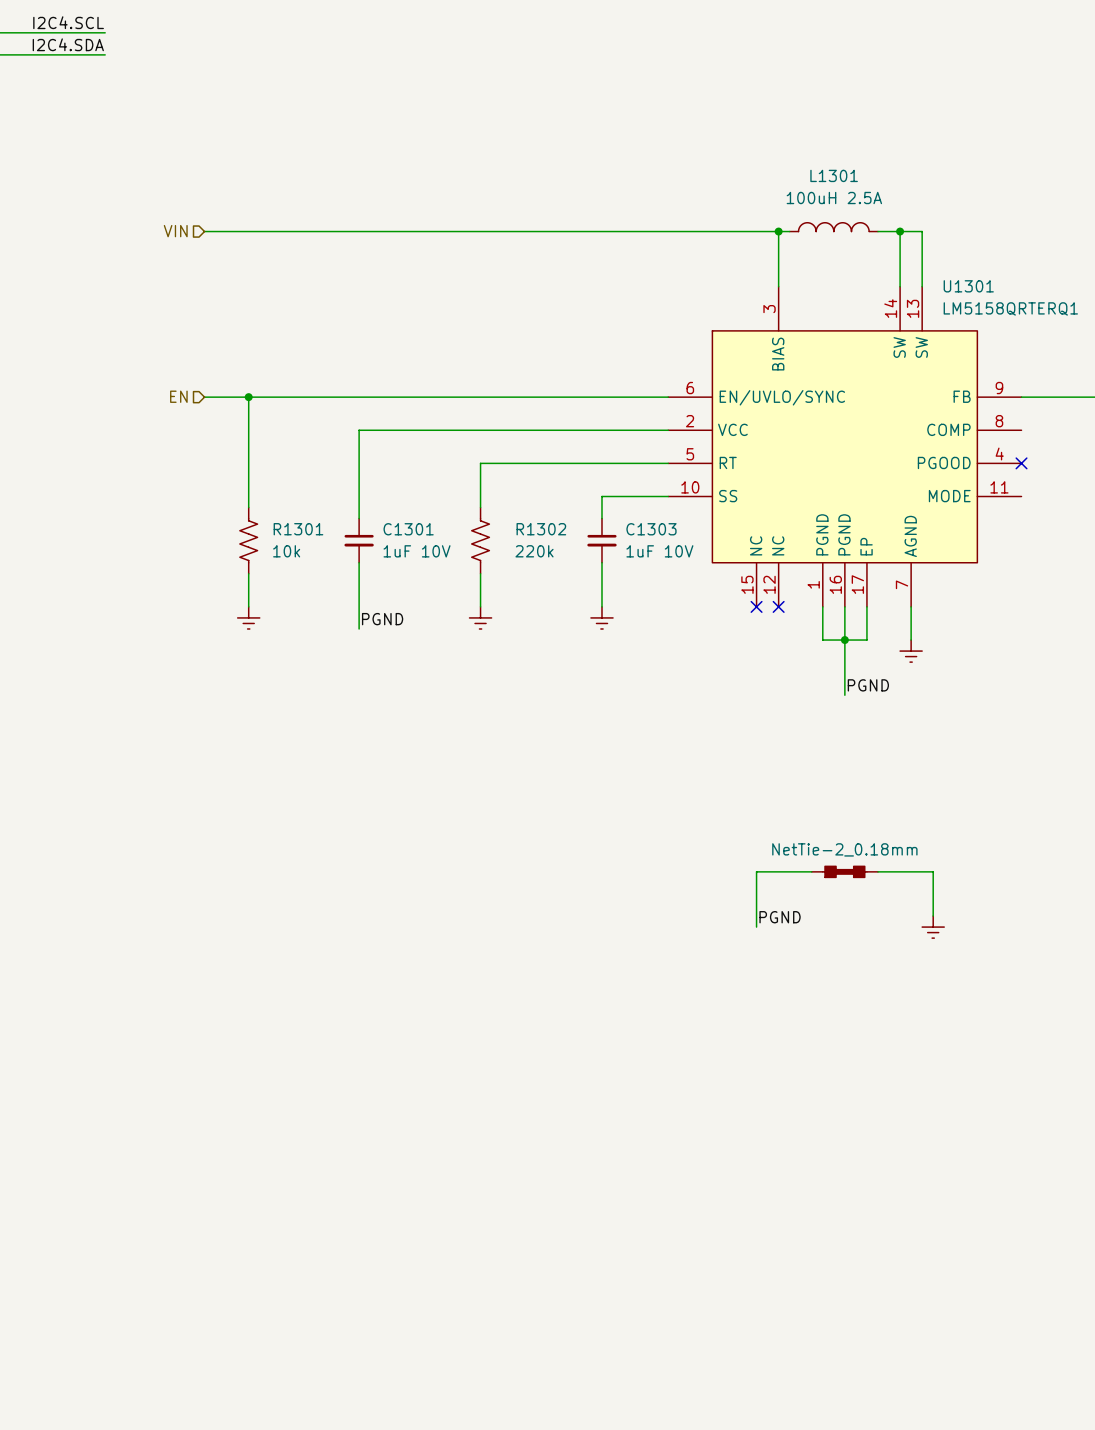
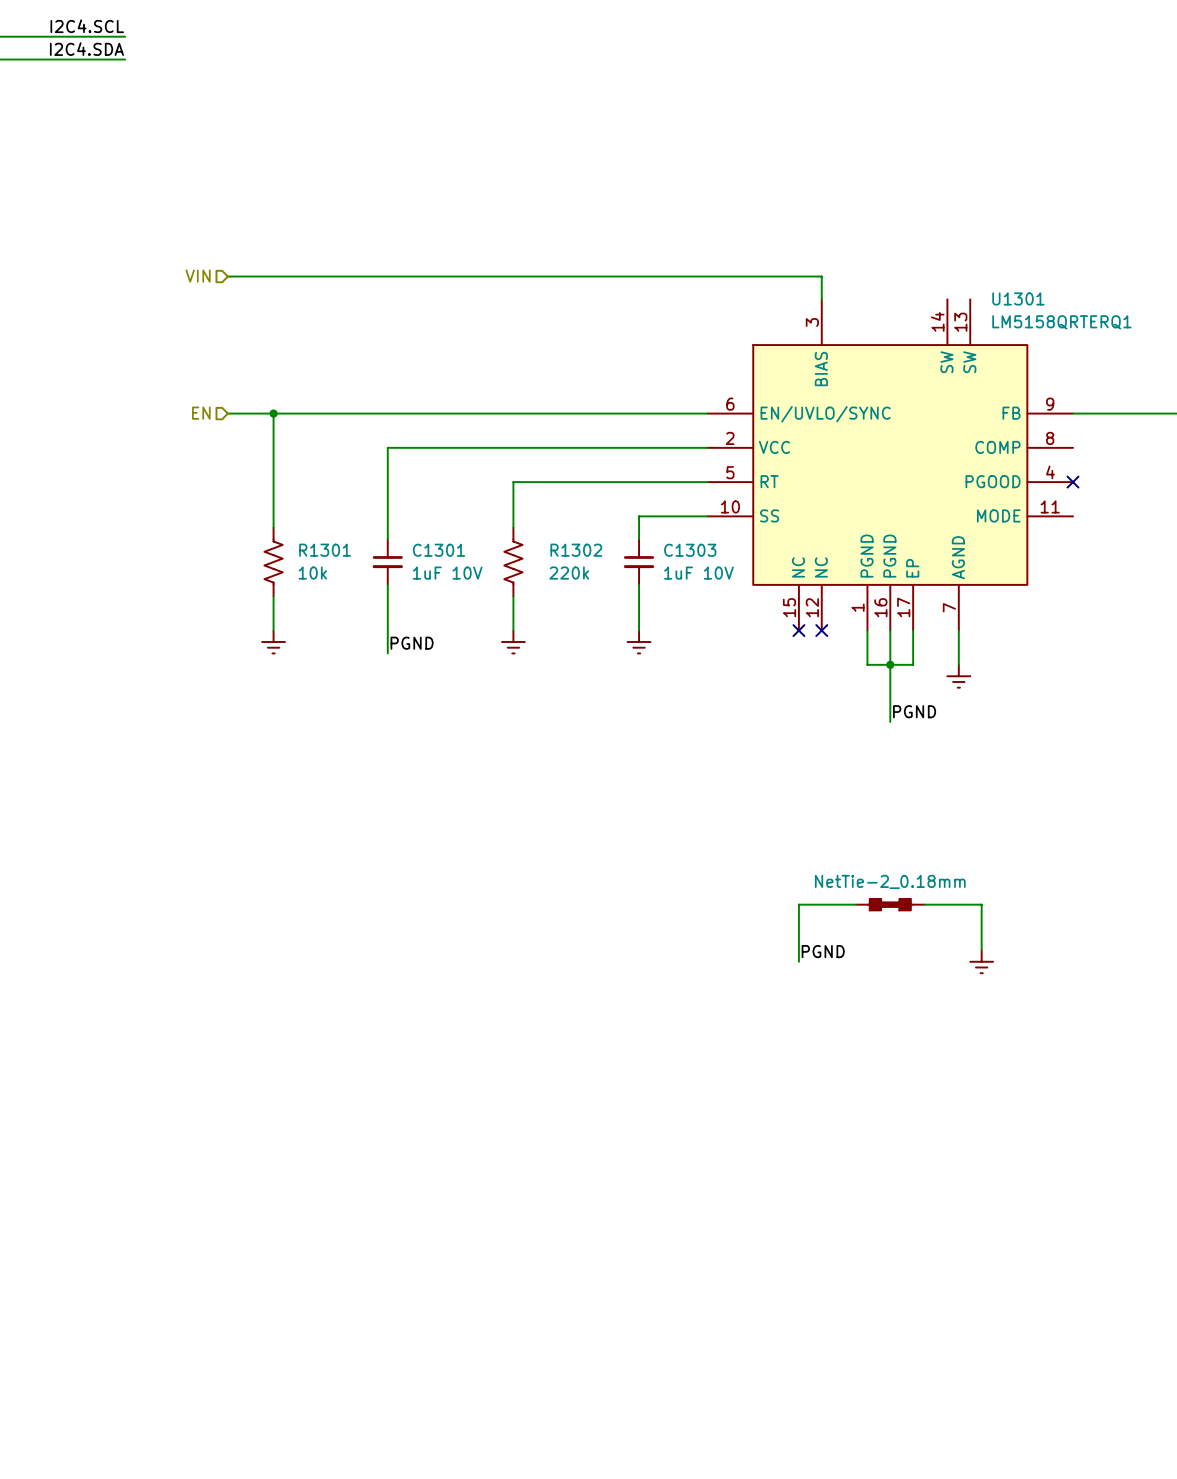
L1301: 100uH 2.5A (833, 227) -> none
hierarchical label position: VIN (175, 231) -> VIN (198, 276)
wire: (204, 231) (789, 231) -> none
wire: (778, 231) (778, 264) -> (227, 276) (821, 276)
junction: (778, 231) -> none
wire: (877, 231) (922, 231) (922, 286) -> none
wire: (900, 231) (900, 286) -> none
junction: (900, 231) -> none

